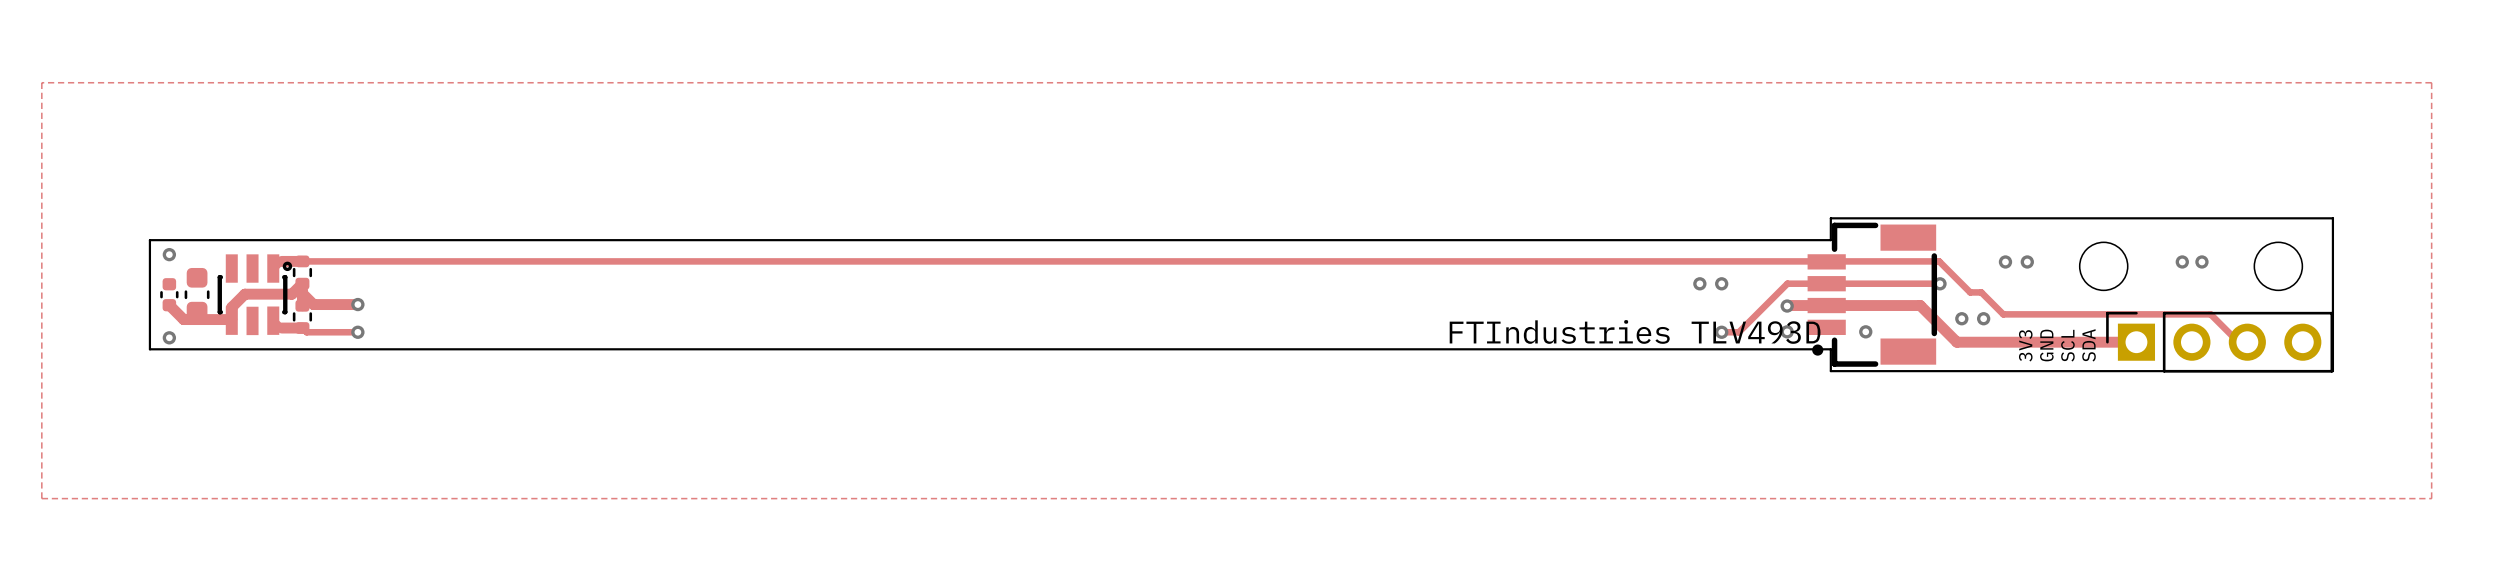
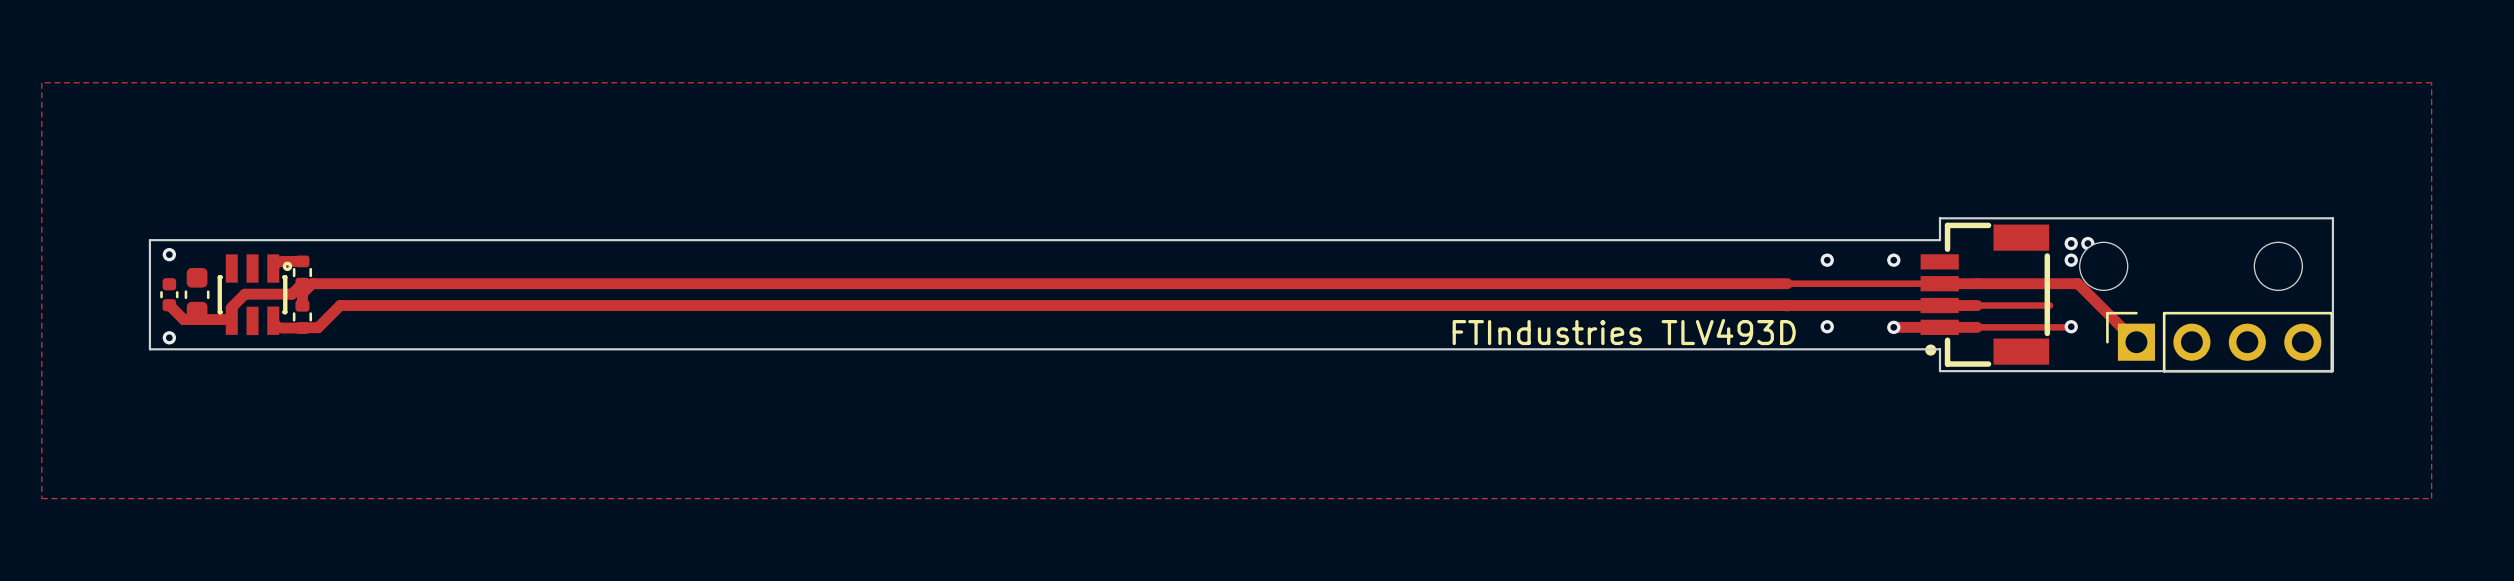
board edge: (1939, 218) (1830, 218) (1830, 240) -> (1939, 218) (1939, 240) (1830, 240)
via: none -> (2071, 243)
via: none -> (2087, 243)
via: none -> (1827, 260)
via: none -> (1893, 260)
via: none -> (2071, 260)
track: (302, 261) (1939, 261) (1970, 292) (1981, 292) (2003, 314) (2210, 314) (2238, 342) (2247, 342) -> none
via: (2005, 261) -> none
via: (2027, 261) -> none
via: (2182, 261) -> none
via: (2201, 261) -> none
via: (1699, 283) -> none
via: (1721, 283) -> none
track: (1787, 283) (1738, 332) (1721, 332) -> (1787, 283) (312, 283) (302, 293)
via: (1939, 283) -> none
track: (302, 293) (313, 304) (357, 304) -> none
part position: (1872, 294) -> (1985, 294)
via: (357, 304) -> none
track: (1920, 305) (1956, 342) (2136, 342) -> (1939, 283) (2077, 283) (2136, 342)
track: none -> (1920, 305) (2050, 305)
via: (1787, 306) -> none
via: (1961, 318) -> none
via: (1983, 318) -> none
via: none -> (1827, 326)
track: none -> (2071, 326) (1893, 327)
via: none -> (2071, 326)
via: none -> (1893, 327)
track: (302, 328) (306, 332) (357, 332) -> (302, 327) (318, 327) (340, 305) (1787, 305)
via: (1787, 331) -> none
via: (1865, 331) -> none
via: (357, 332) -> none
via: (1721, 332) -> none
text: 3V3 (2025, 345) -> none
text: GND (2046, 345) -> none
text: SCL (2067, 345) -> none
text: SDA (2089, 345) -> none
board edge: (1830, 349) (1830, 371) (1939, 371) -> (1830, 349) (1939, 349) (1939, 371)

